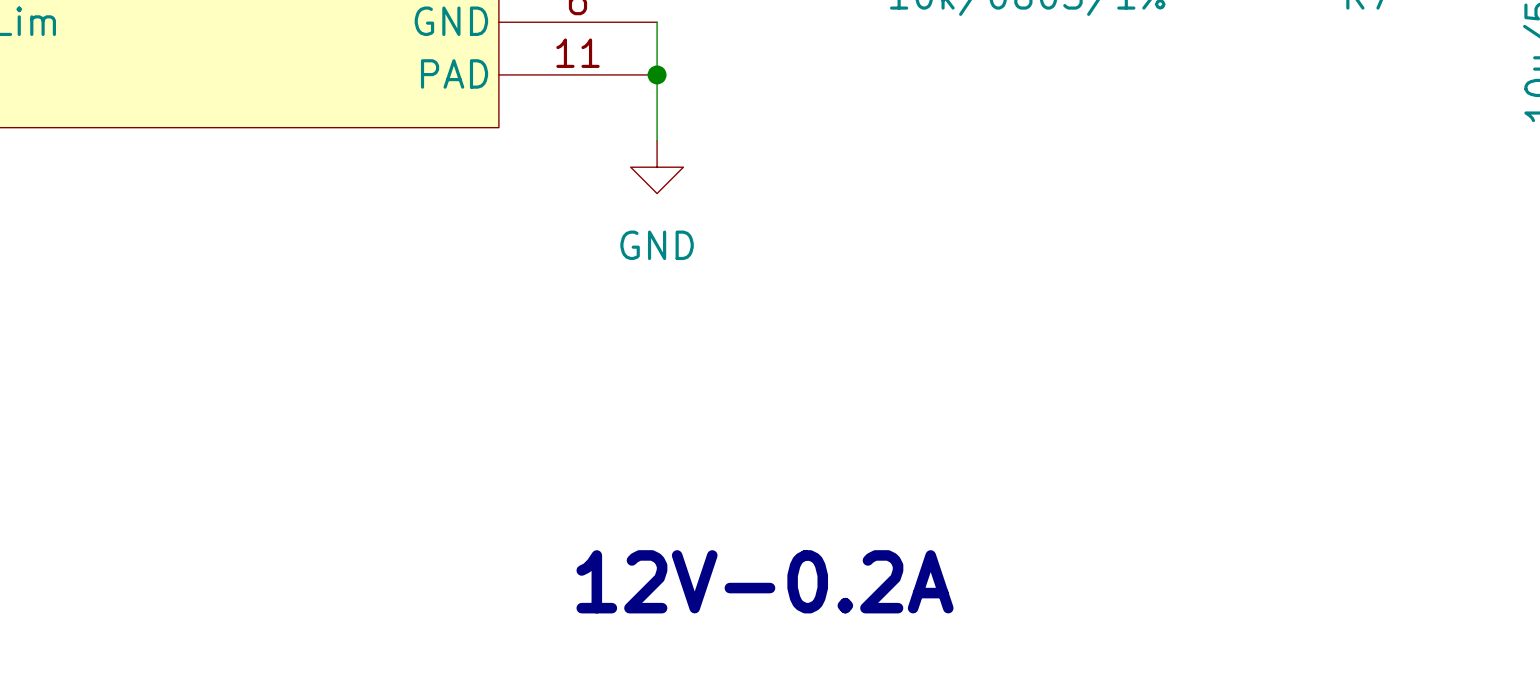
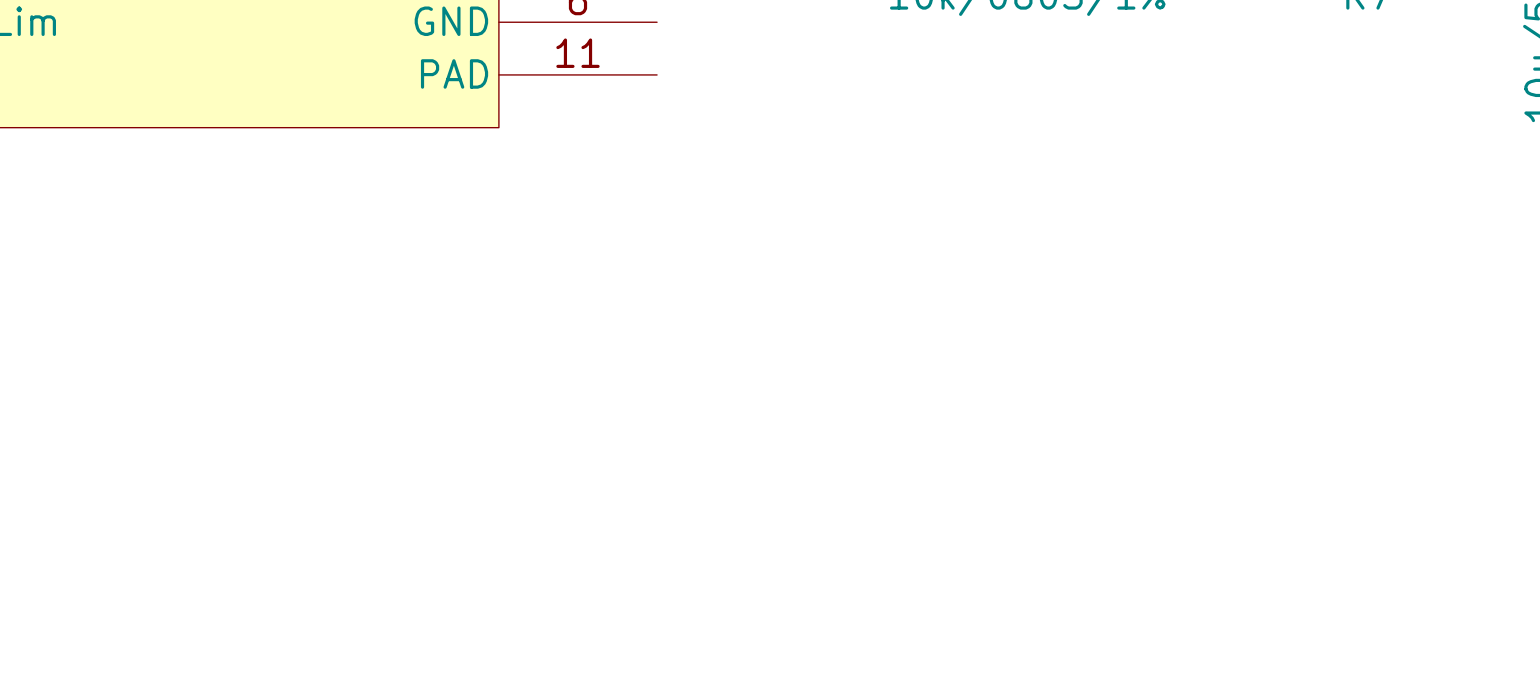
wire: (657, 22) (657, 140) -> none
junction: (657, 74) -> none
power symbol: GND (657, 167) -> none
text: 12V-0.2A (765, 581) -> none

